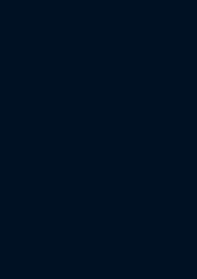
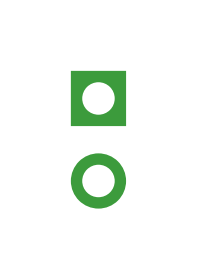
part: none -> (98, 139)

